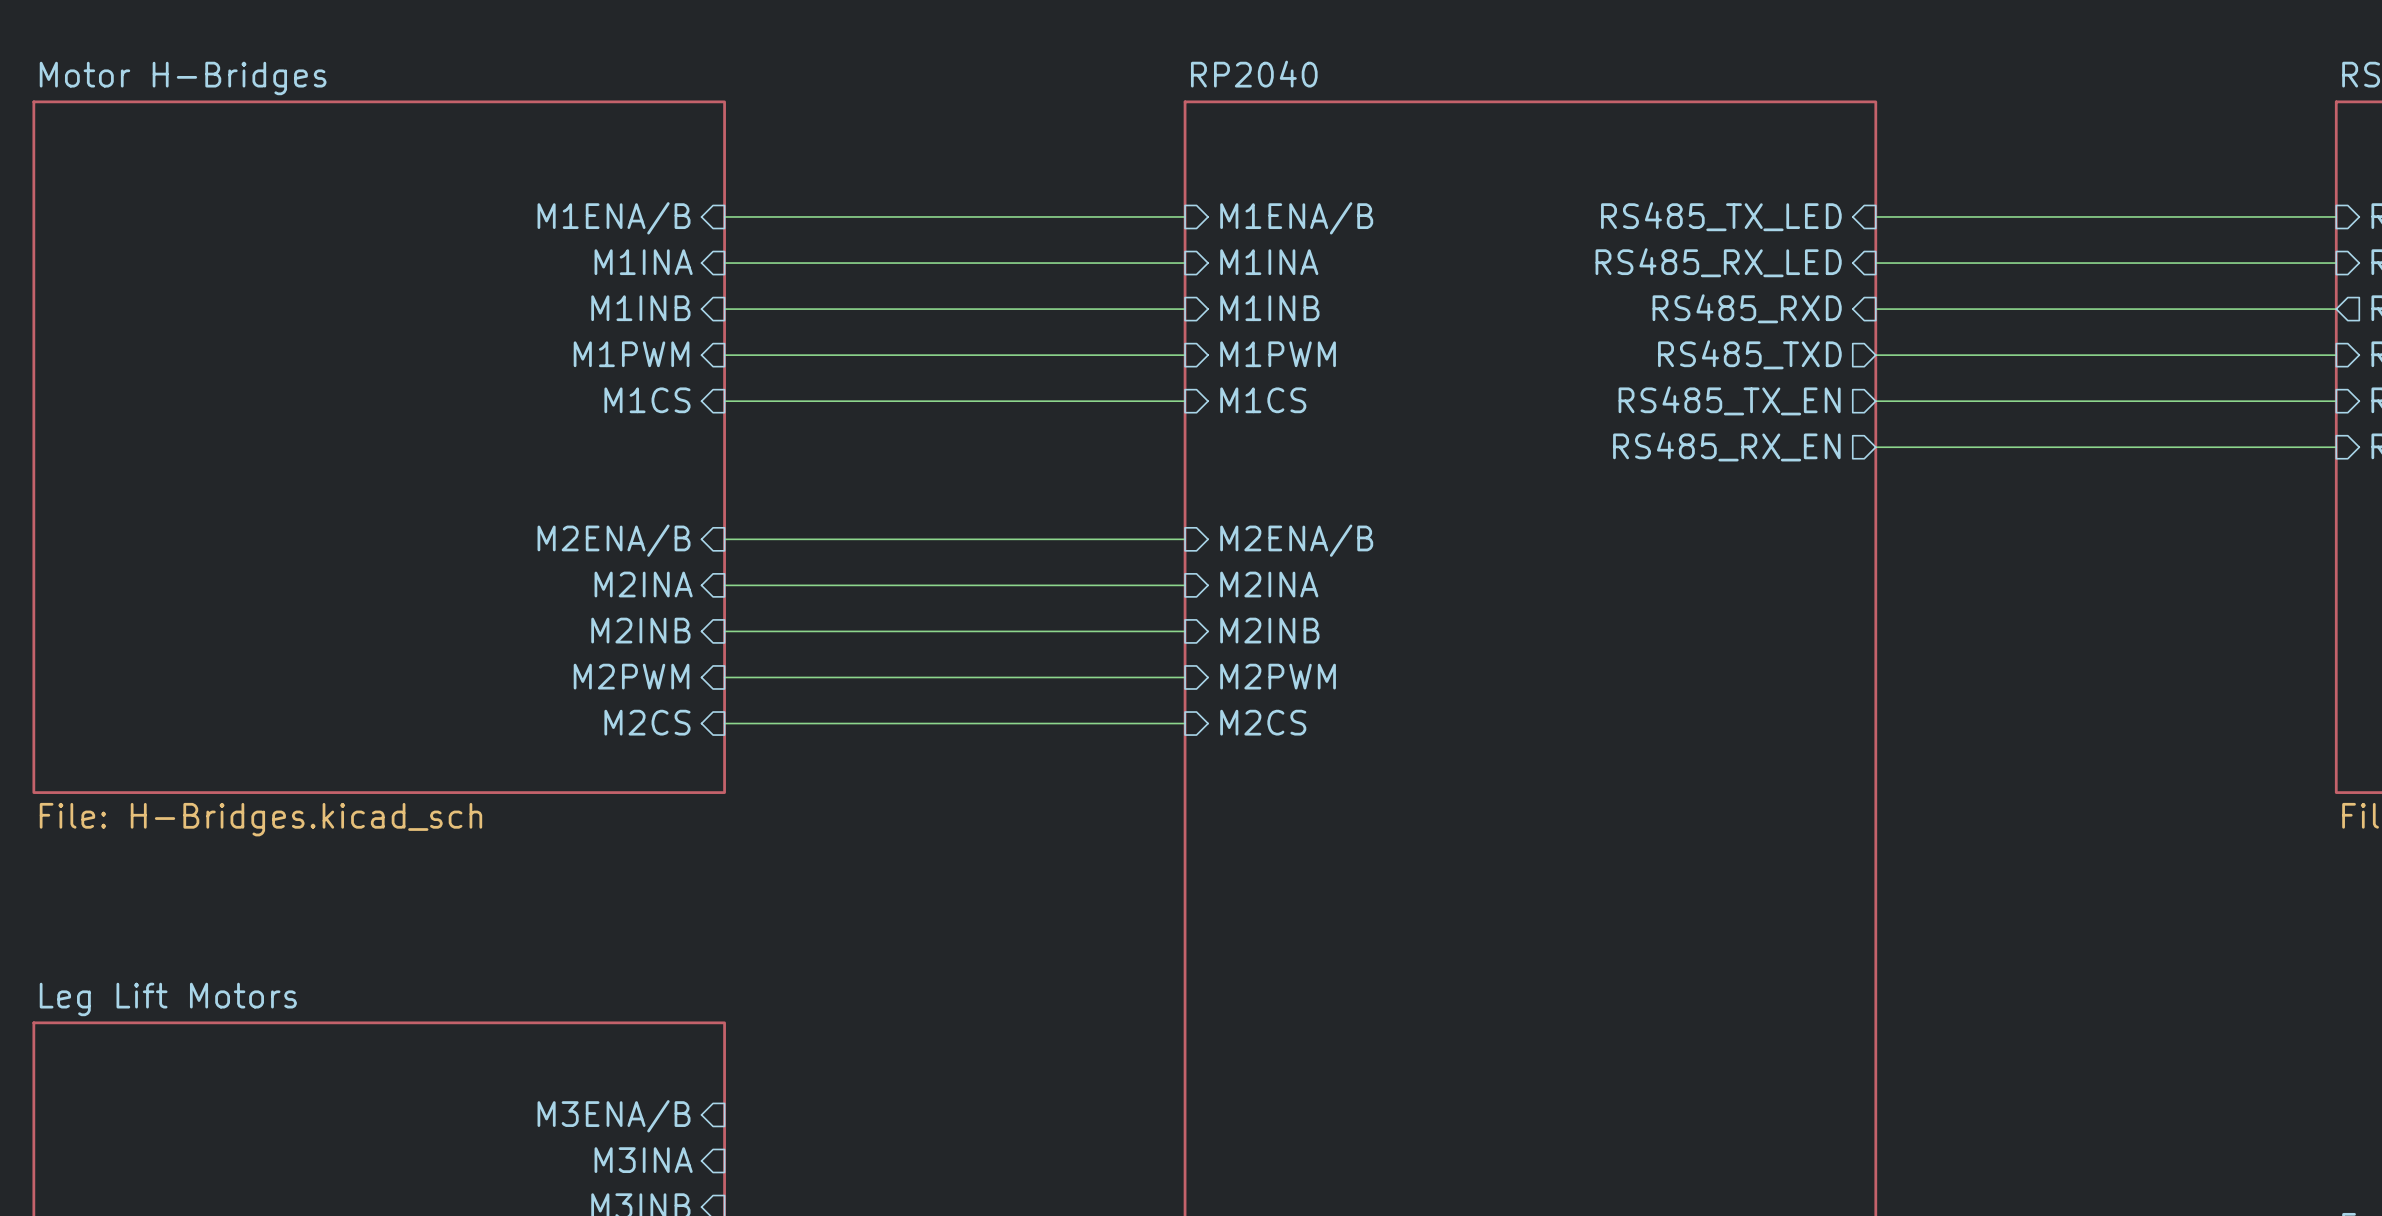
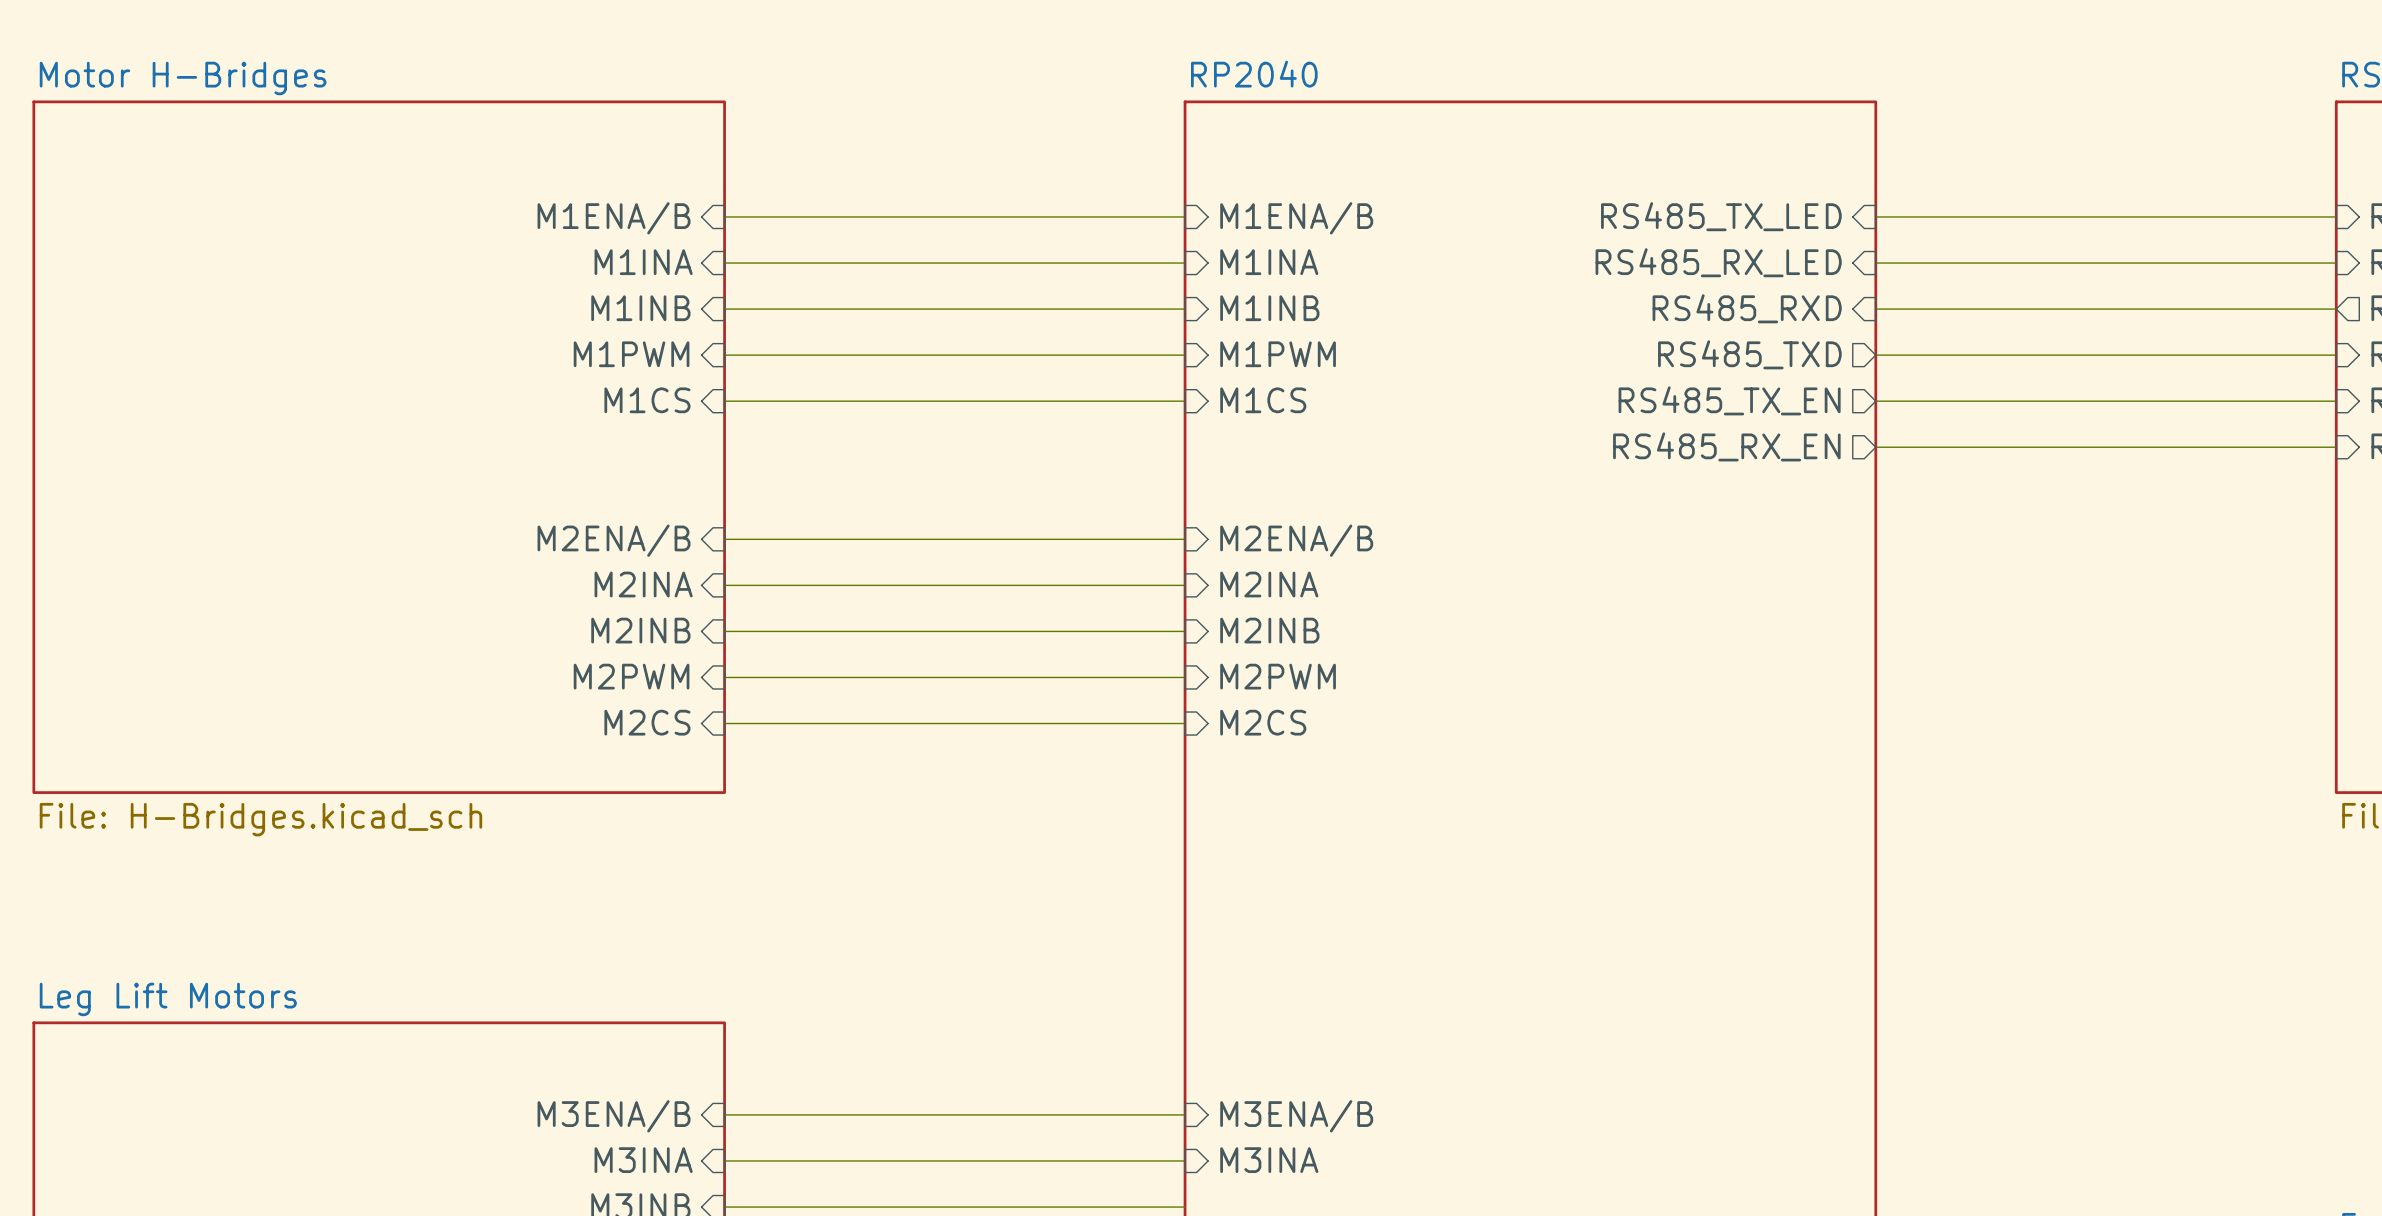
wire: none -> (724, 1114) (1185, 1114)
sheet pin: none -> M3ENA/B (1296, 1116)
wire: none -> (724, 1160) (1185, 1160)
sheet pin: none -> M3INA (1269, 1160)
wire: none -> (724, 1207) (1185, 1207)

